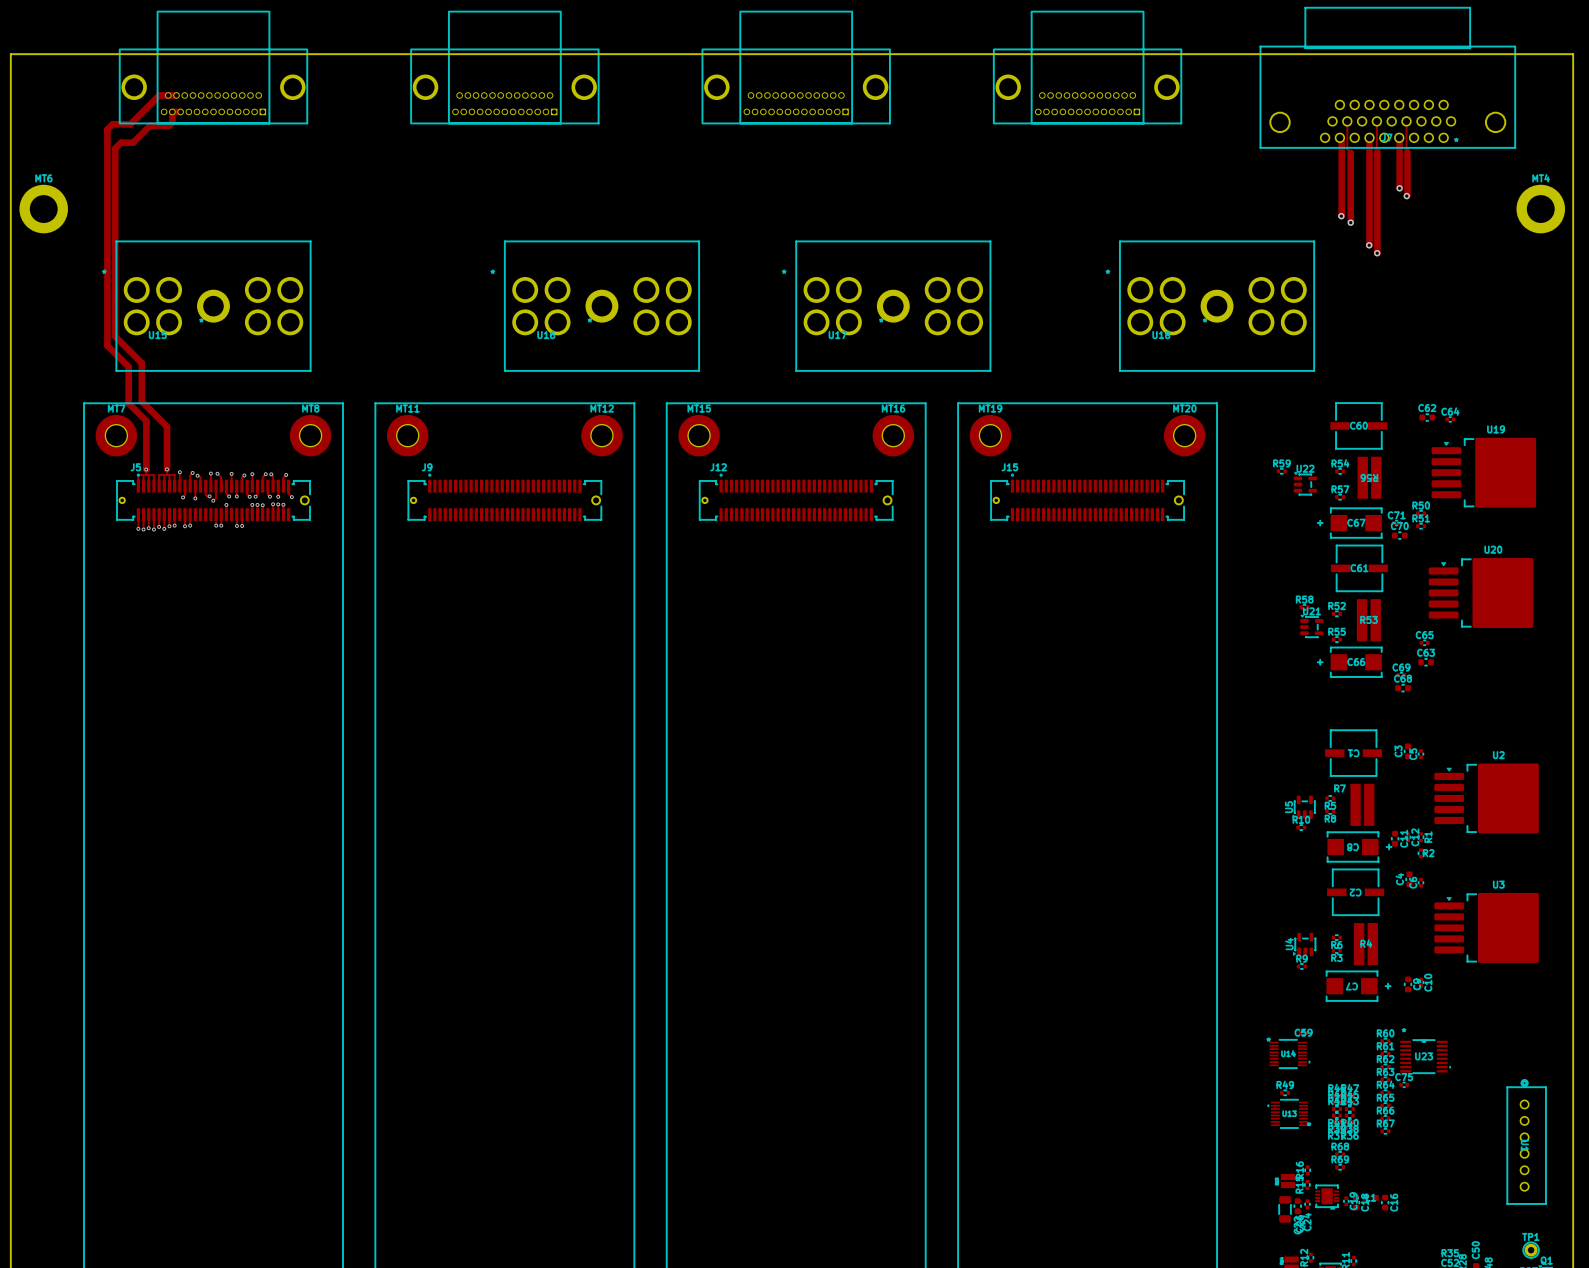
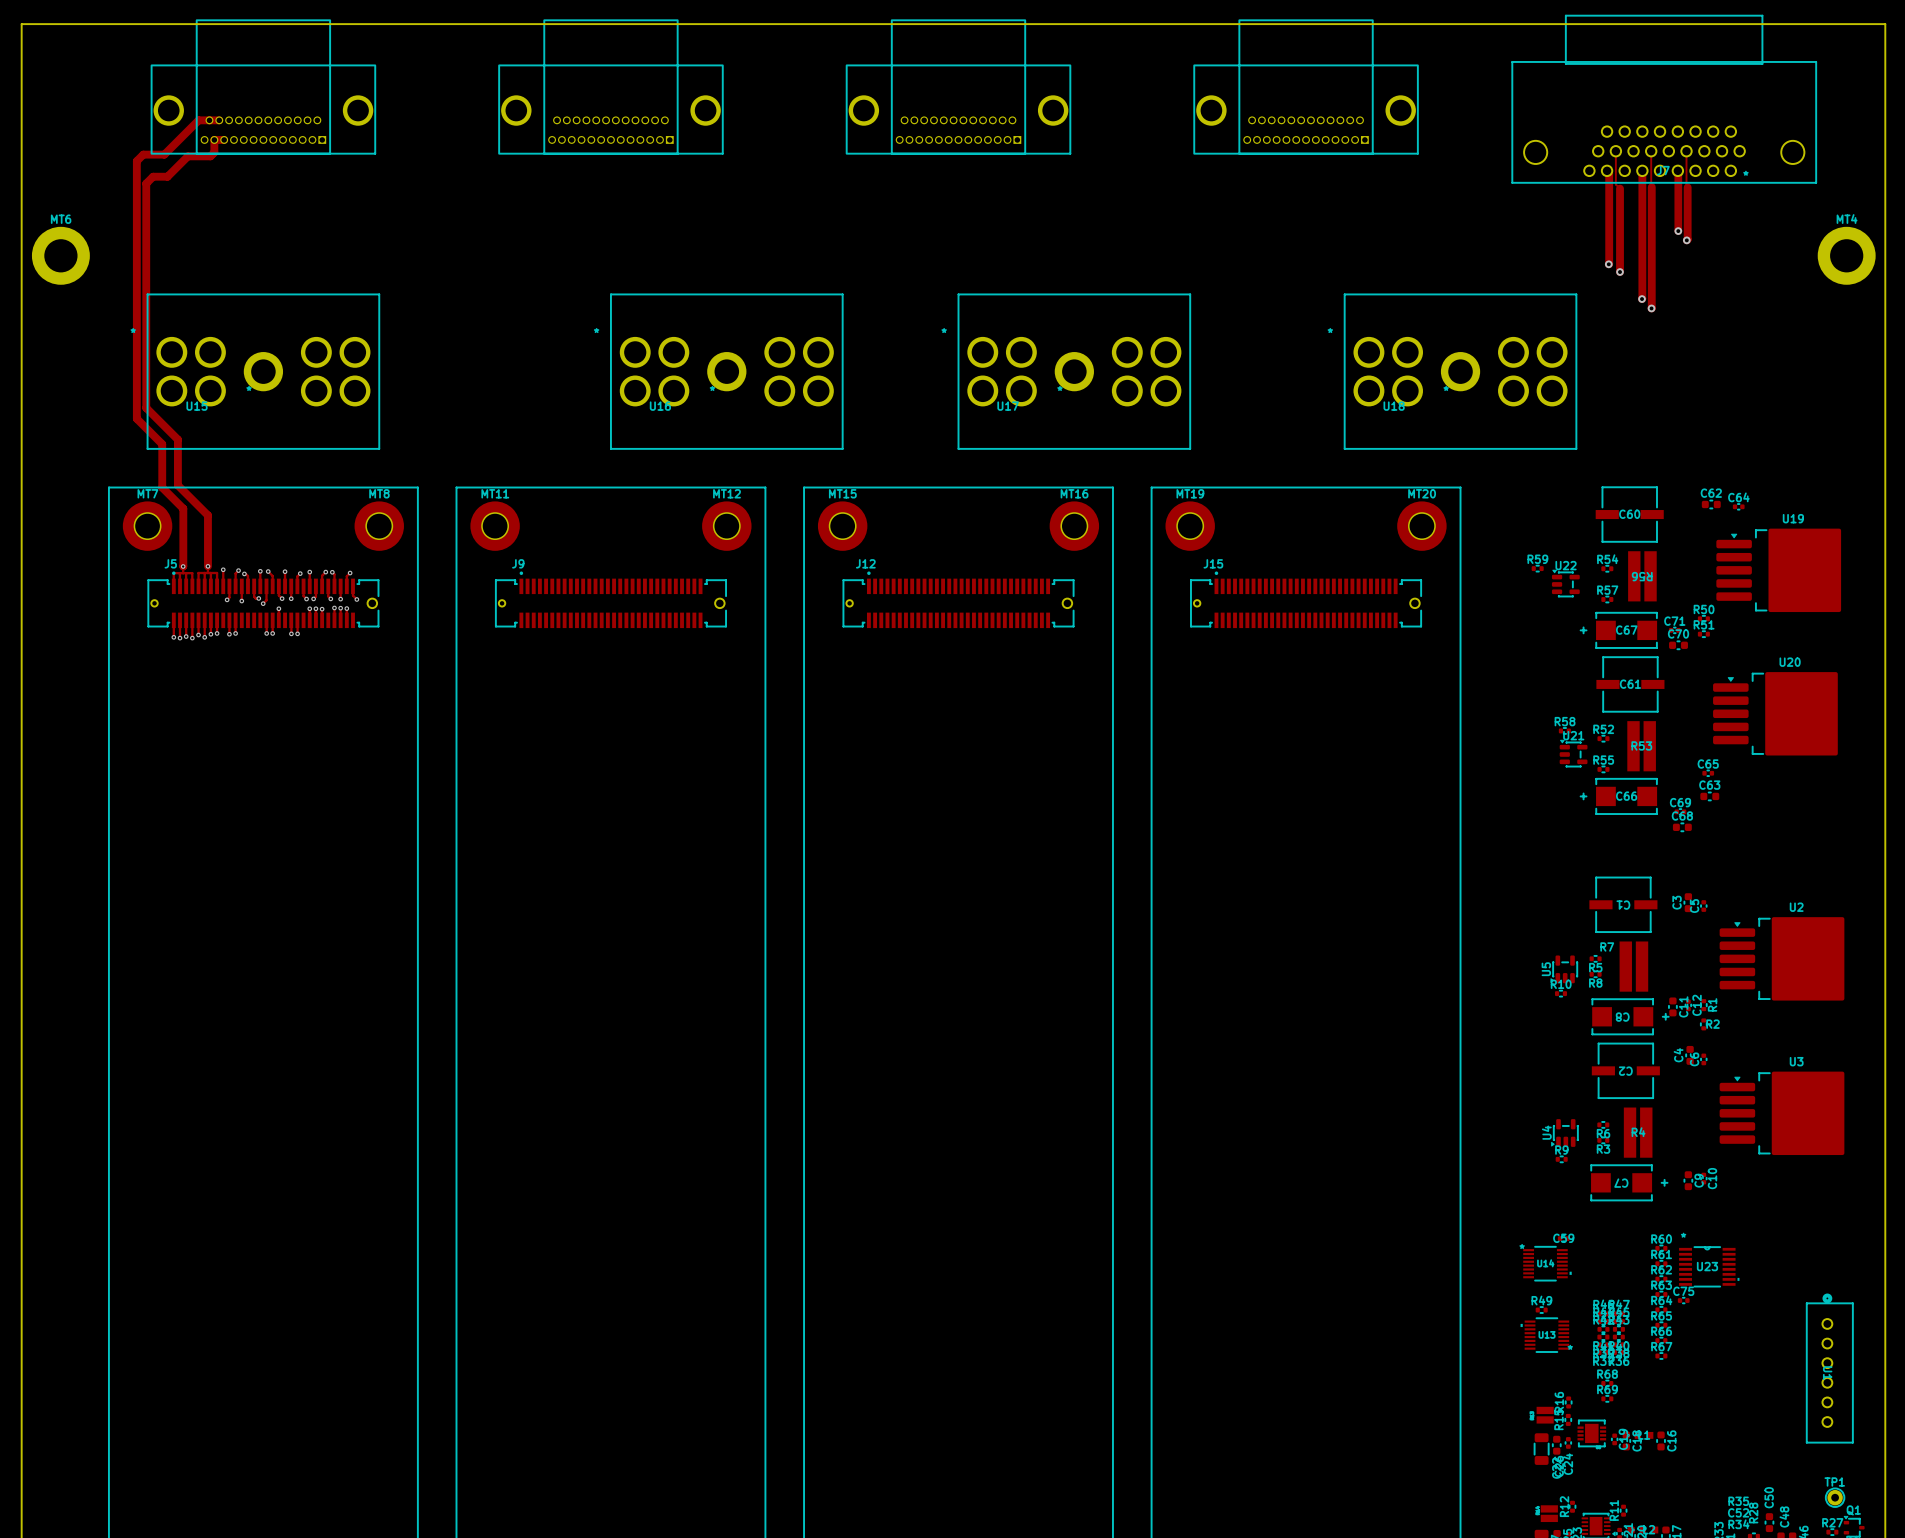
board edge: (10, 54) (1573, 54) -> (21, 71) (21, 24) (1885, 24) (1885, 71)

